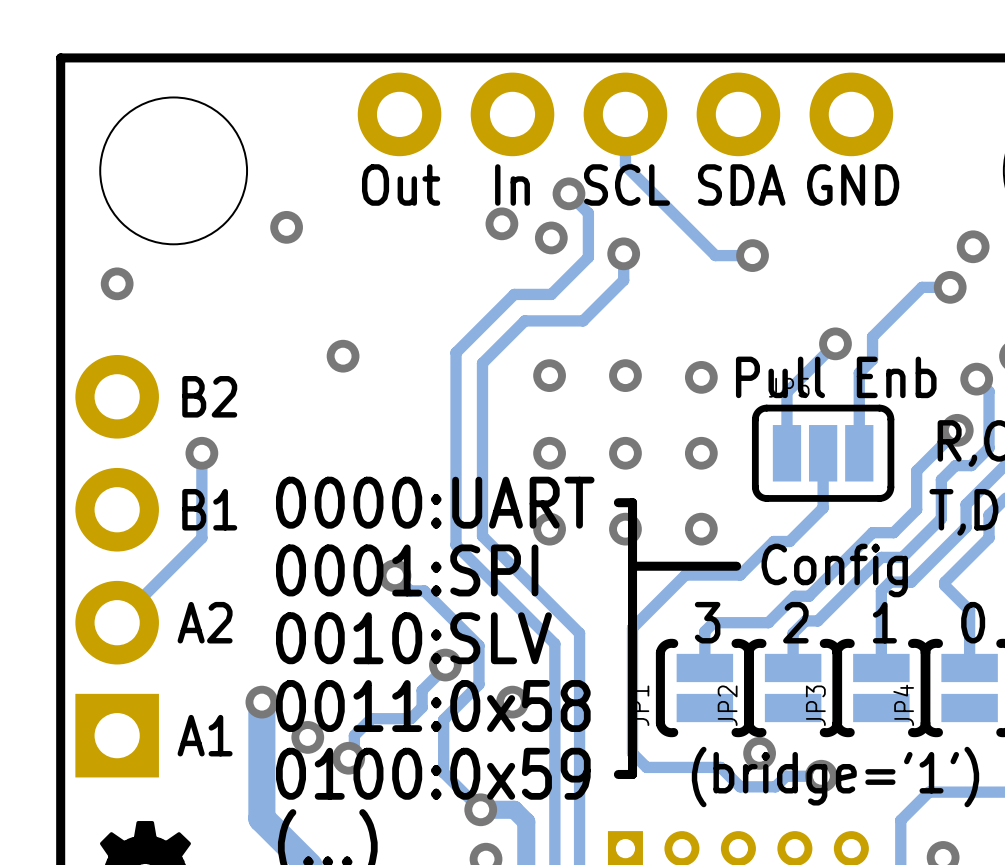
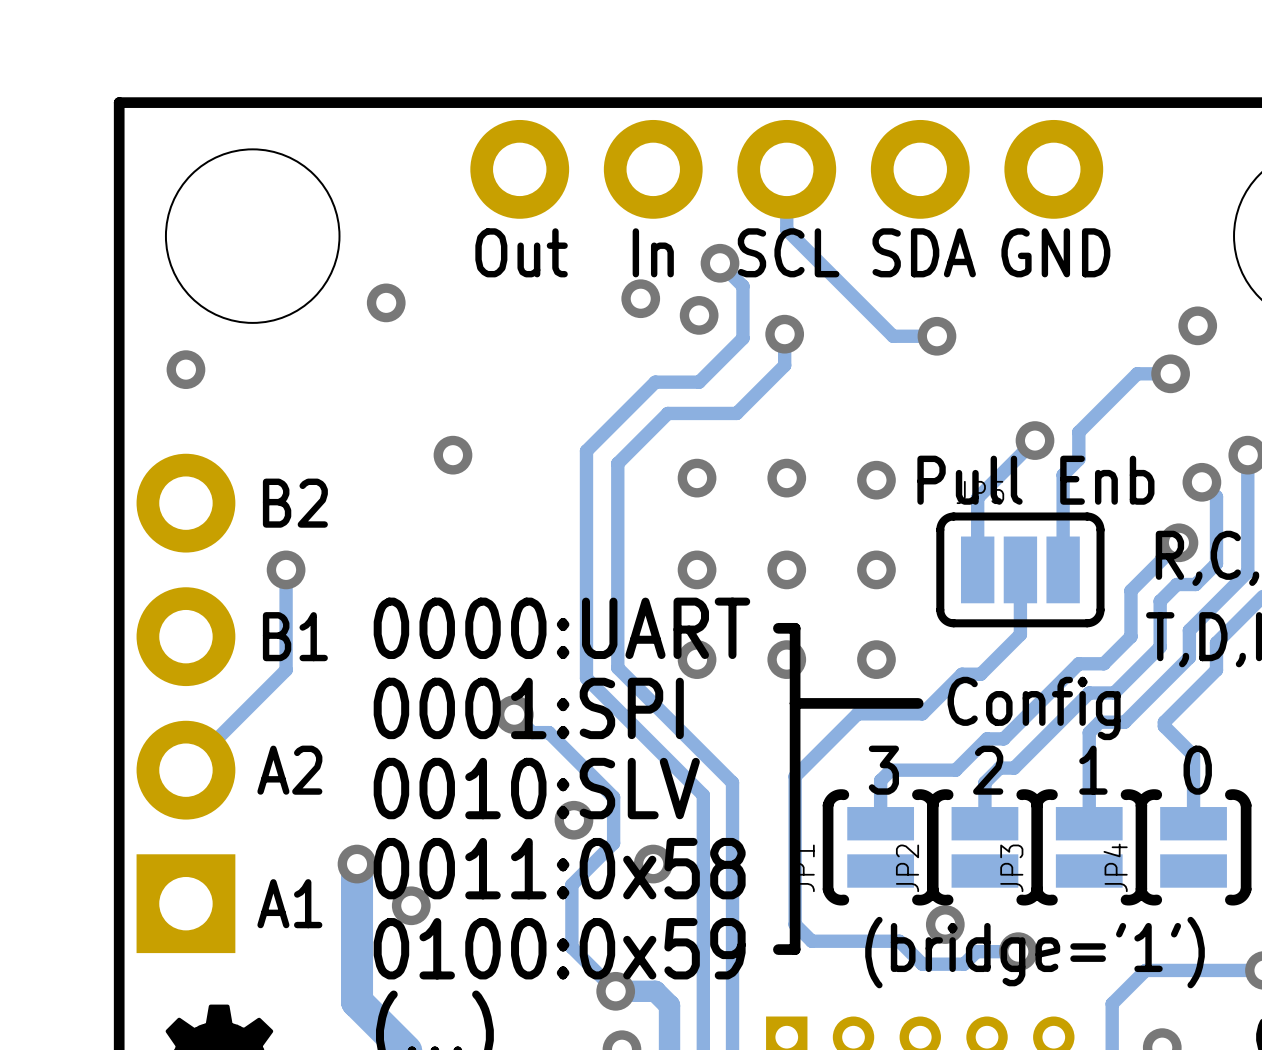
track: (445, 665) (422, 690) (422, 707) (410, 718) (371, 718) (354, 735) (354, 752) (348, 758) -> none
via: (348, 758) -> none

